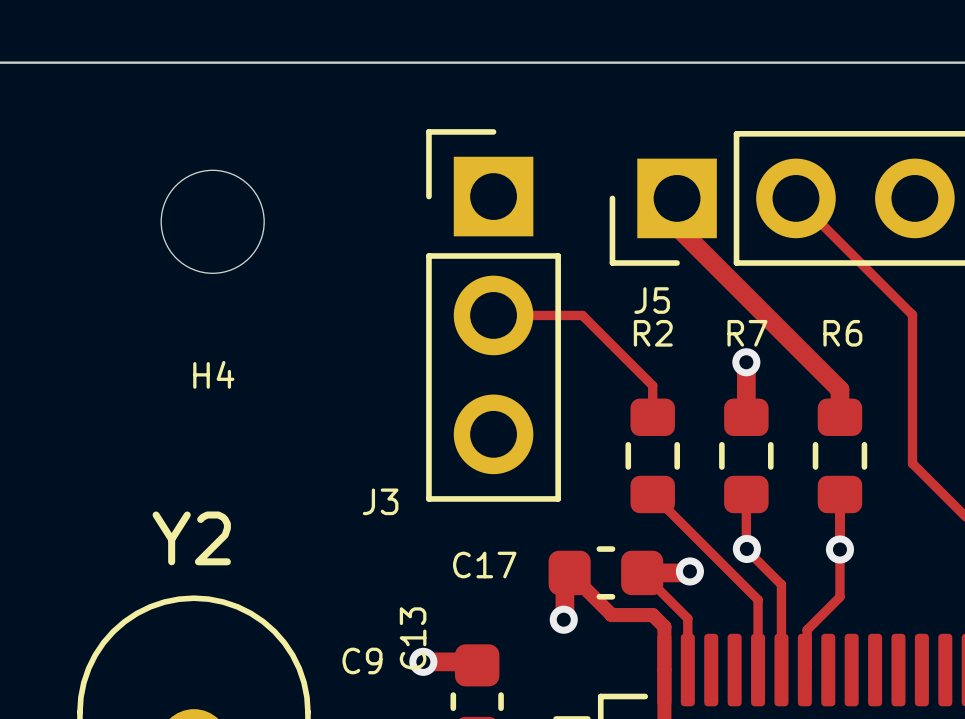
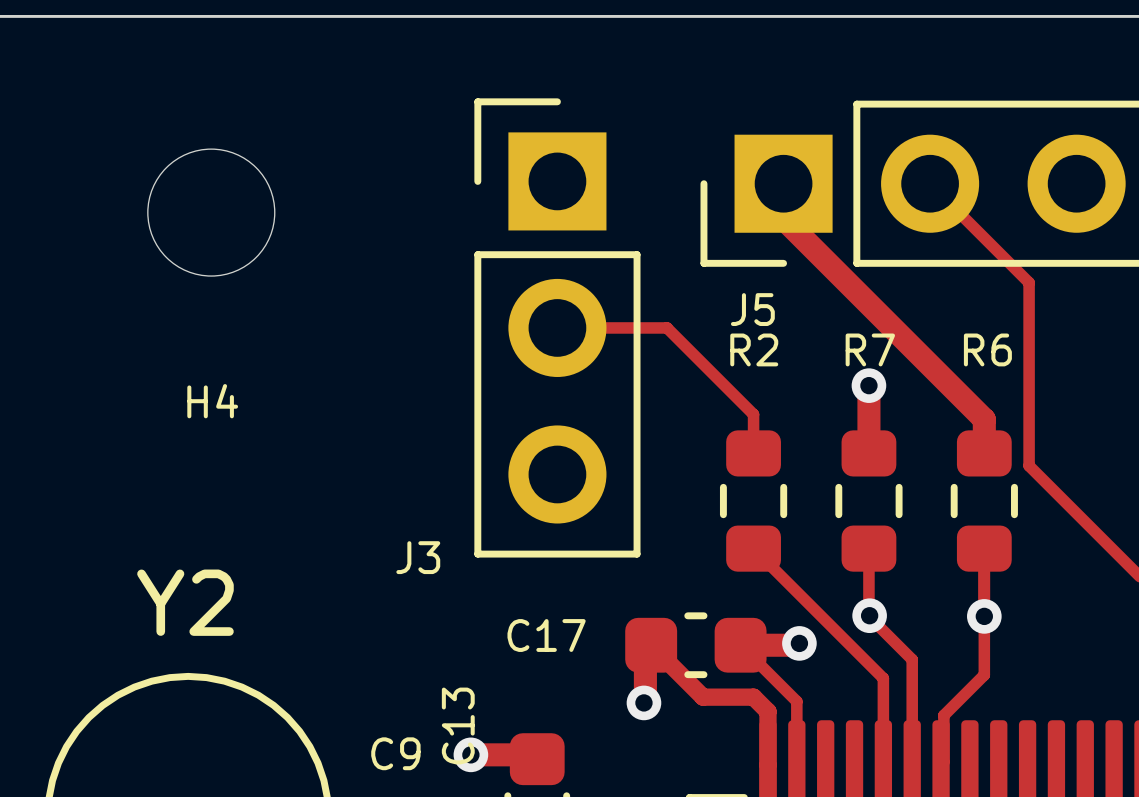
track: (876, 278) (912, 314) (912, 463) -> (1029, 282) (1029, 465) (1073, 510)

